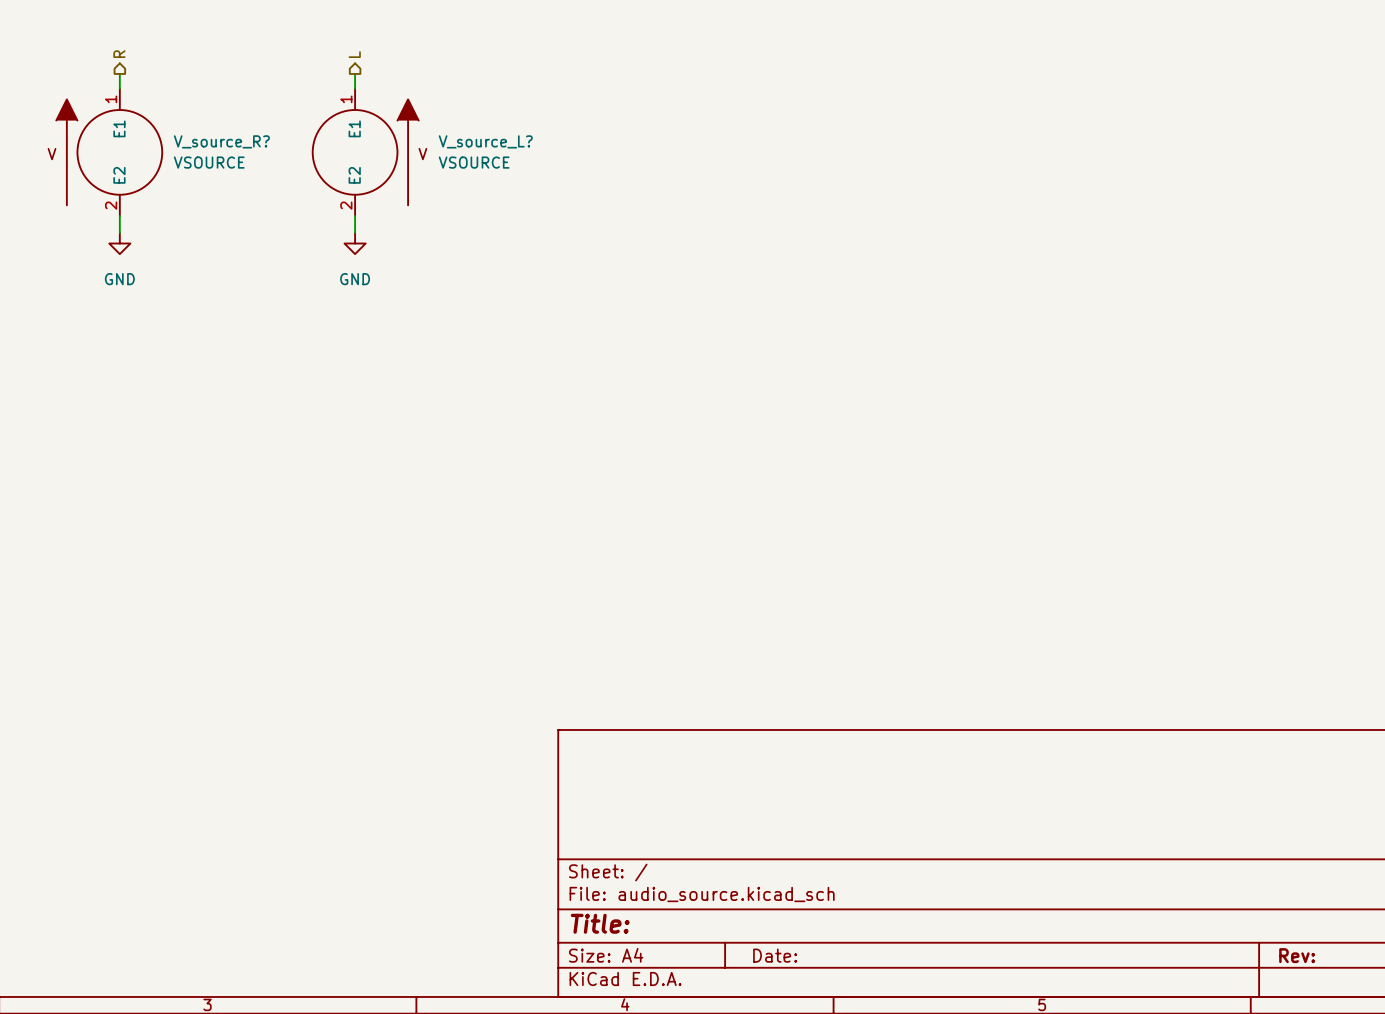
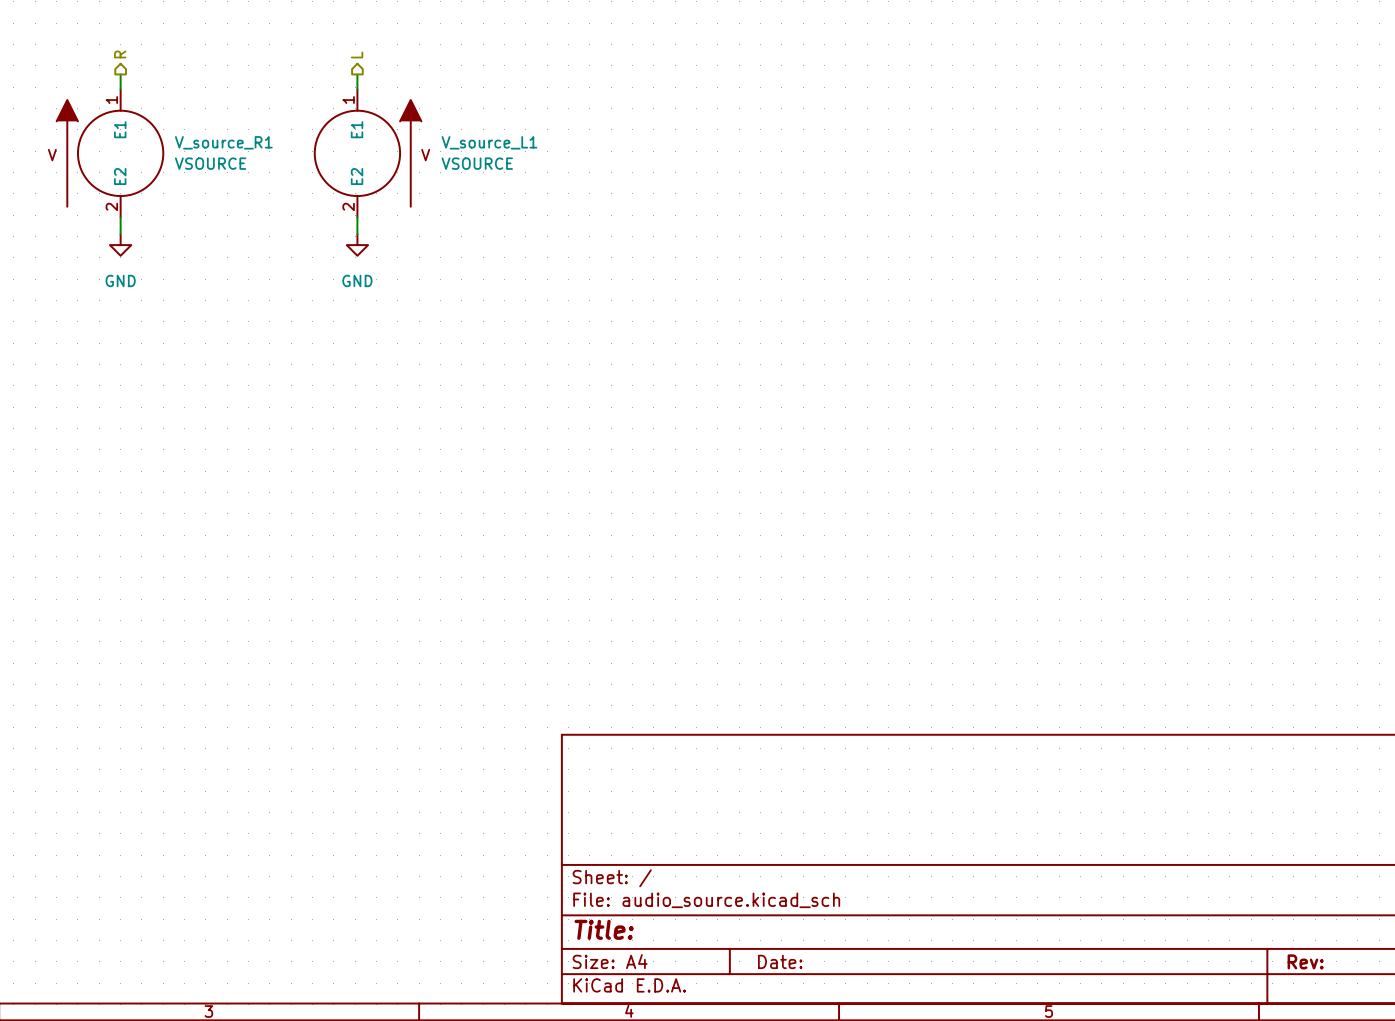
V_source_R? name: V_source_R? (221, 141) -> V_source_R1 (223, 142)
V_source_L? name: V_source_L? (485, 141) -> V_source_L1 (489, 142)

